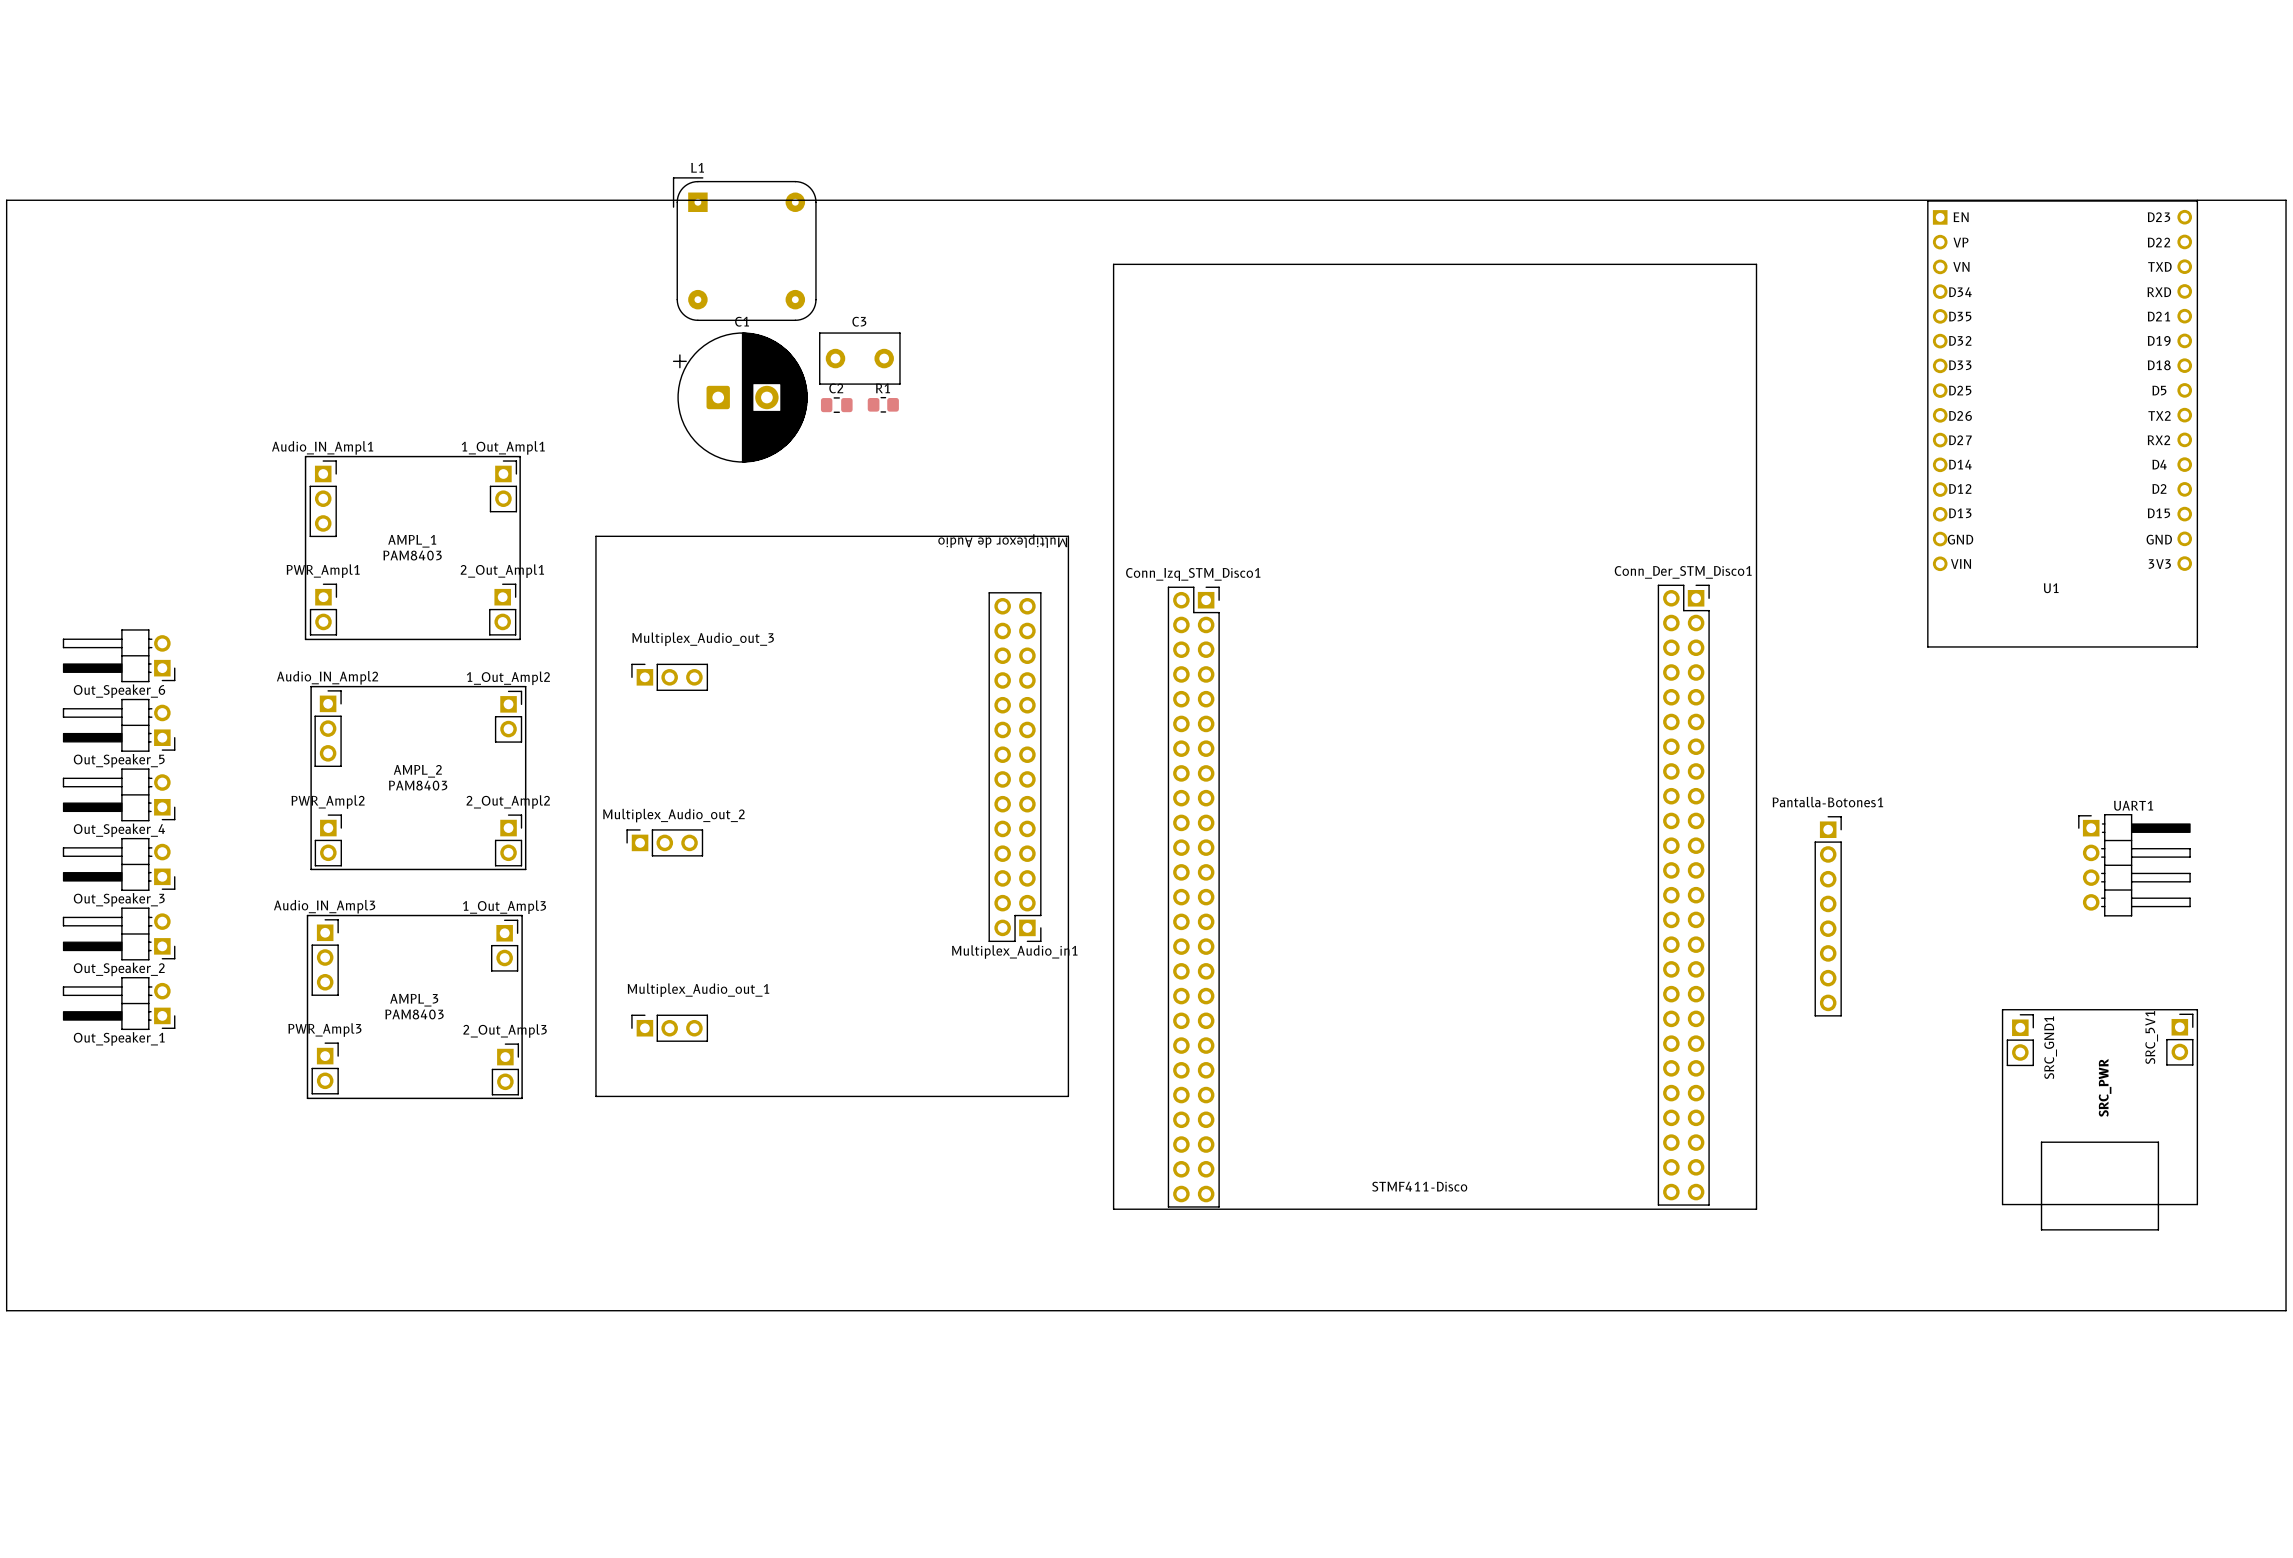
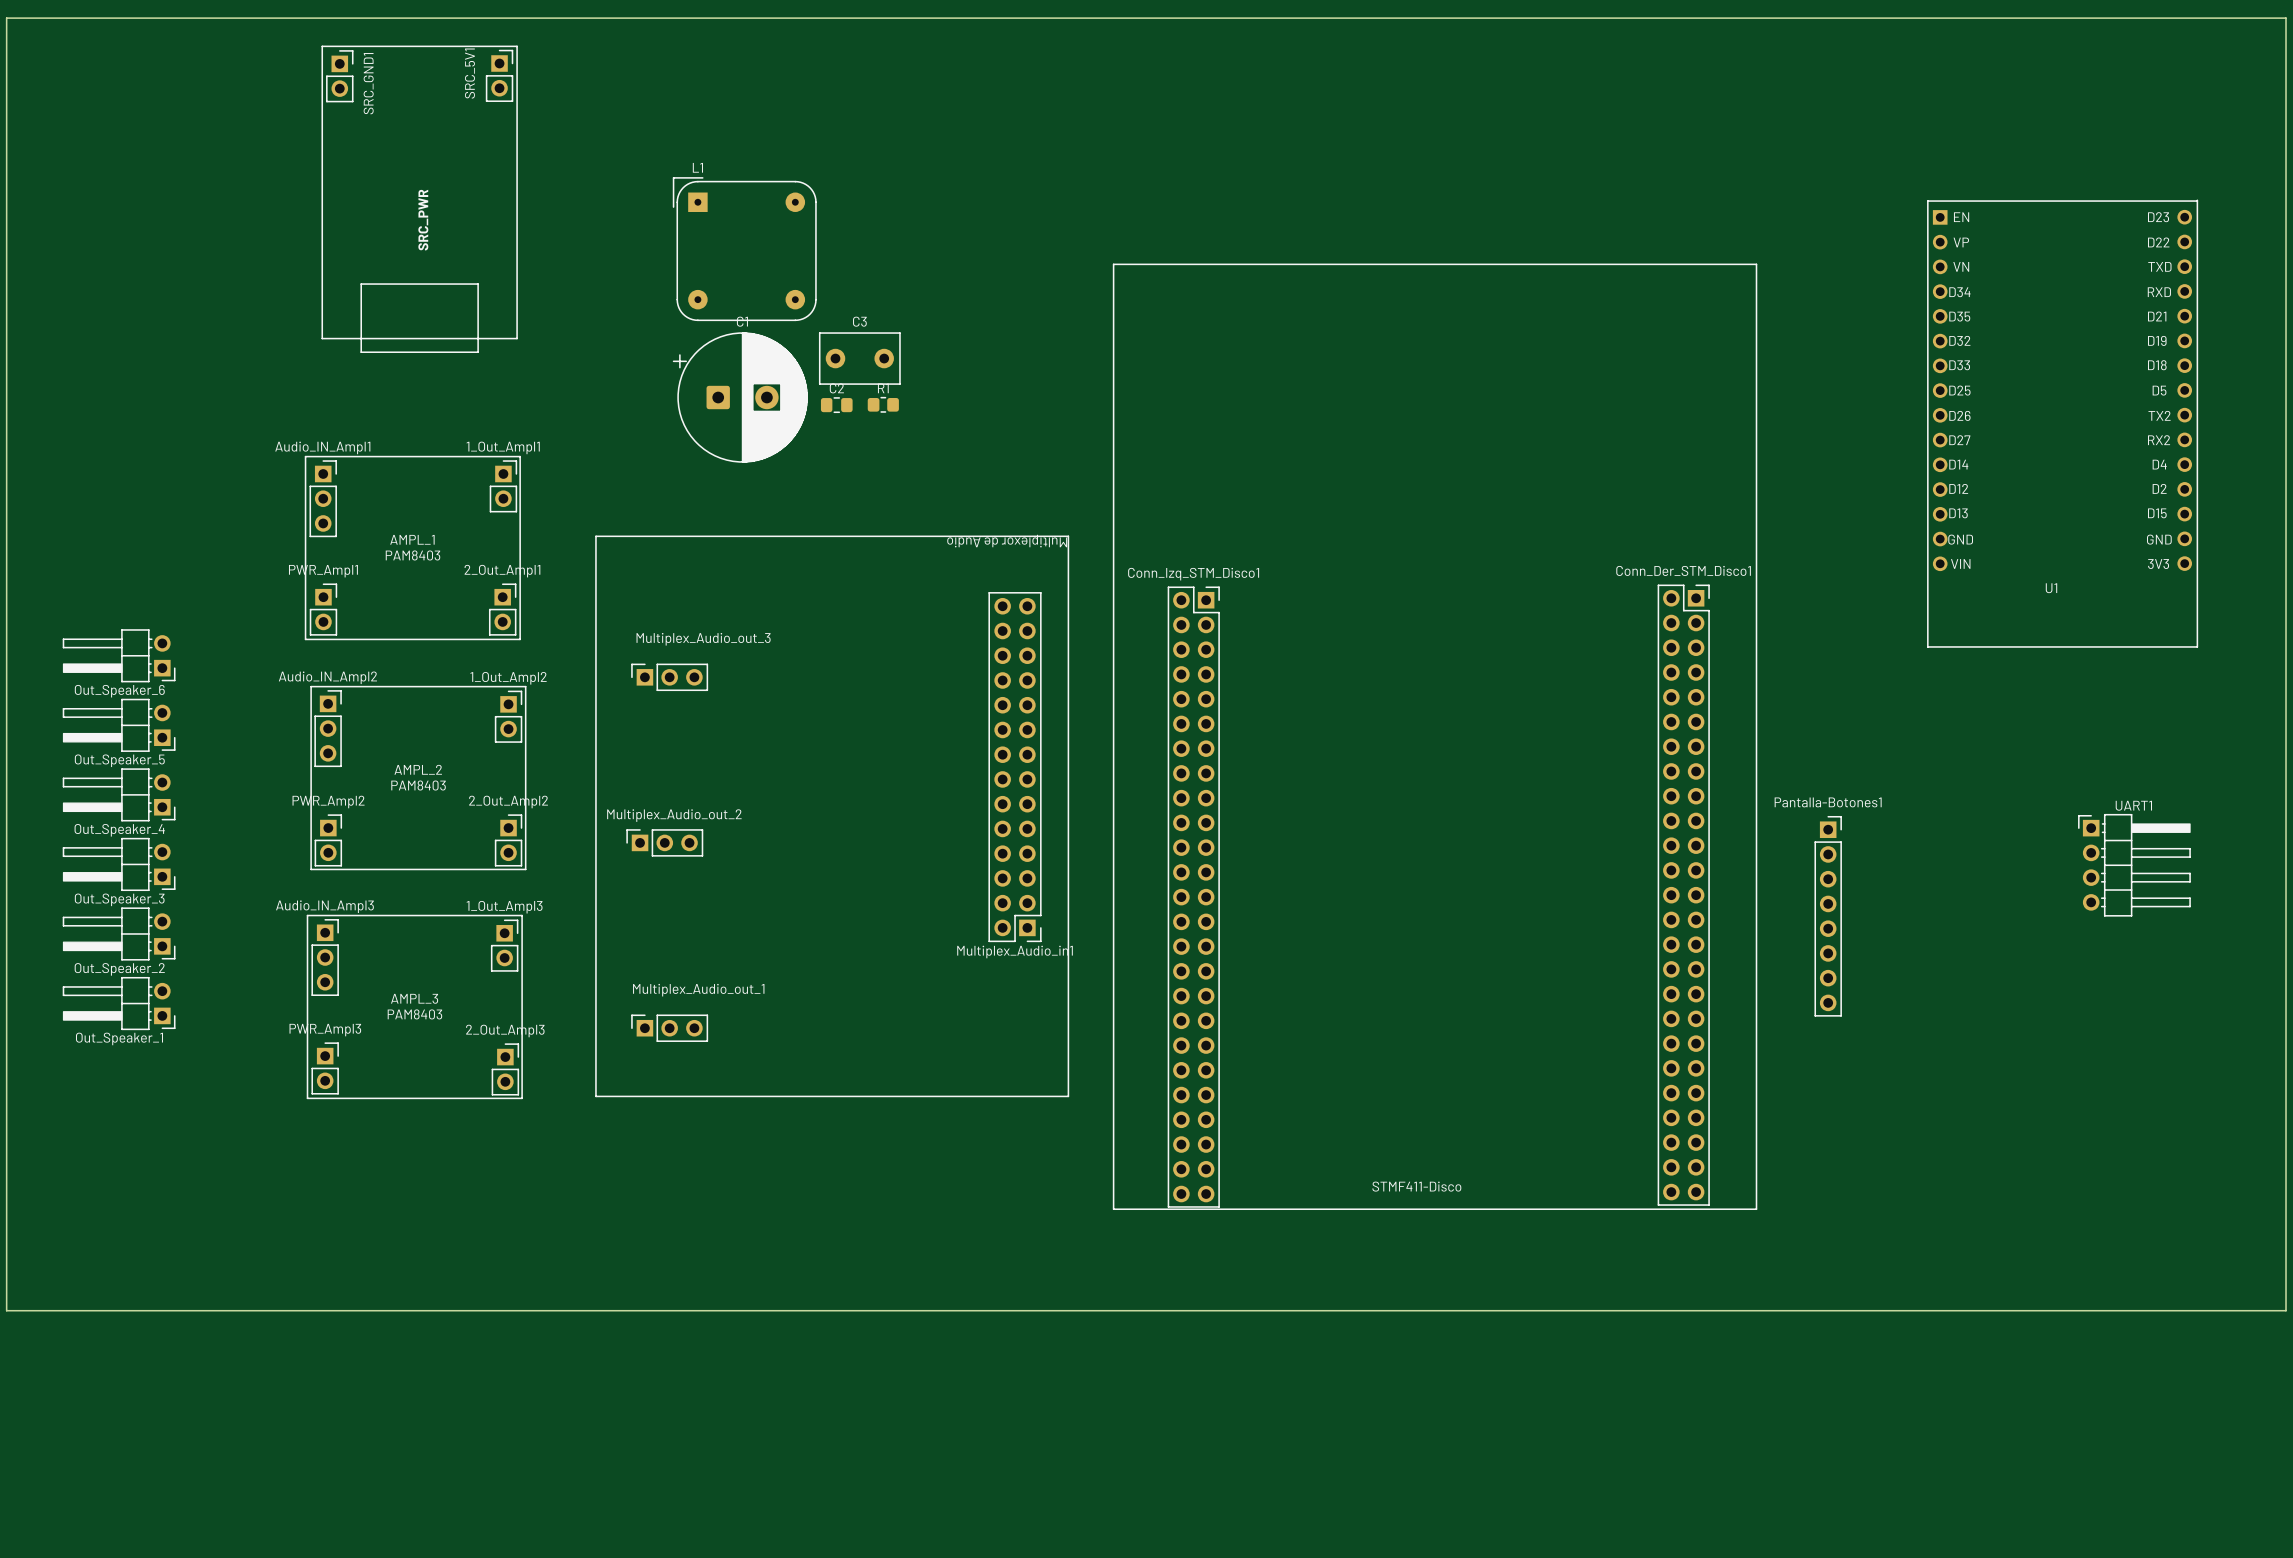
line: none -> (322, 46) (517, 46) (517, 338) (322, 338) (322, 46)
board edge: (6, 200) (2286, 200) -> (6, 200) (6, 18) (2286, 18) (2286, 200)
text: none -> SRC_PWR (423, 220)
line: none -> (361, 284) (478, 284) (478, 352) (361, 352) (361, 284)
line: (2002, 1009) (2197, 1009) (2197, 1204) (2002, 1204) (2002, 1009) -> none
SRC_5V1 position: (2179, 1039) -> (499, 75)
SRC_GND1 position: (2020, 1040) -> (339, 76)
text: SRC_PWR (2105, 1087) -> none
line: (2041, 1142) (2158, 1142) (2158, 1229) (2041, 1229) (2041, 1142) -> none

